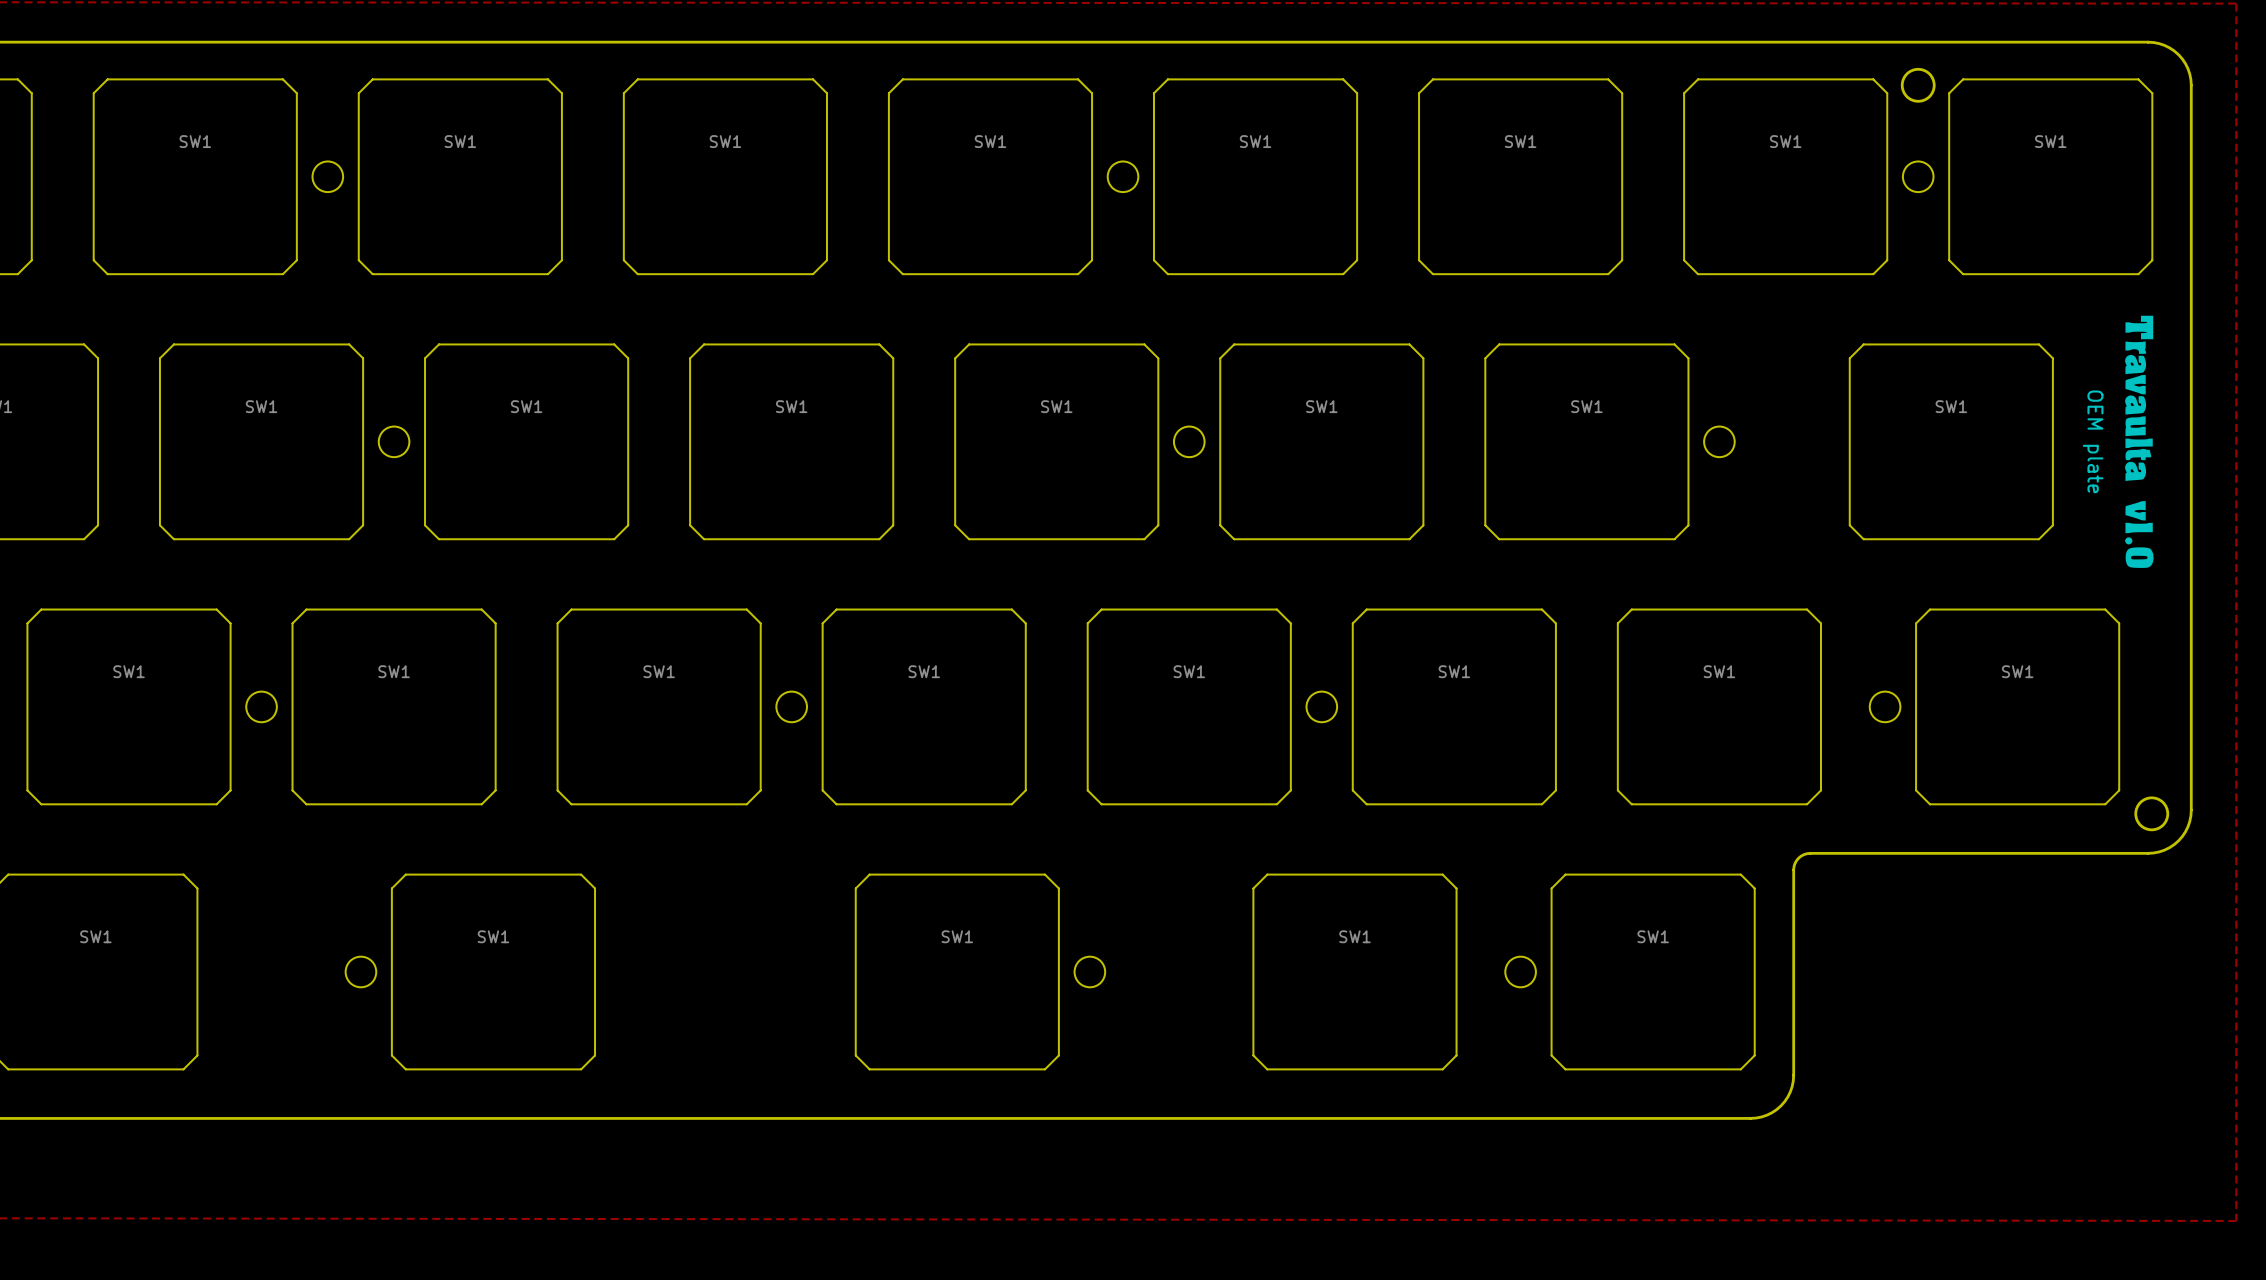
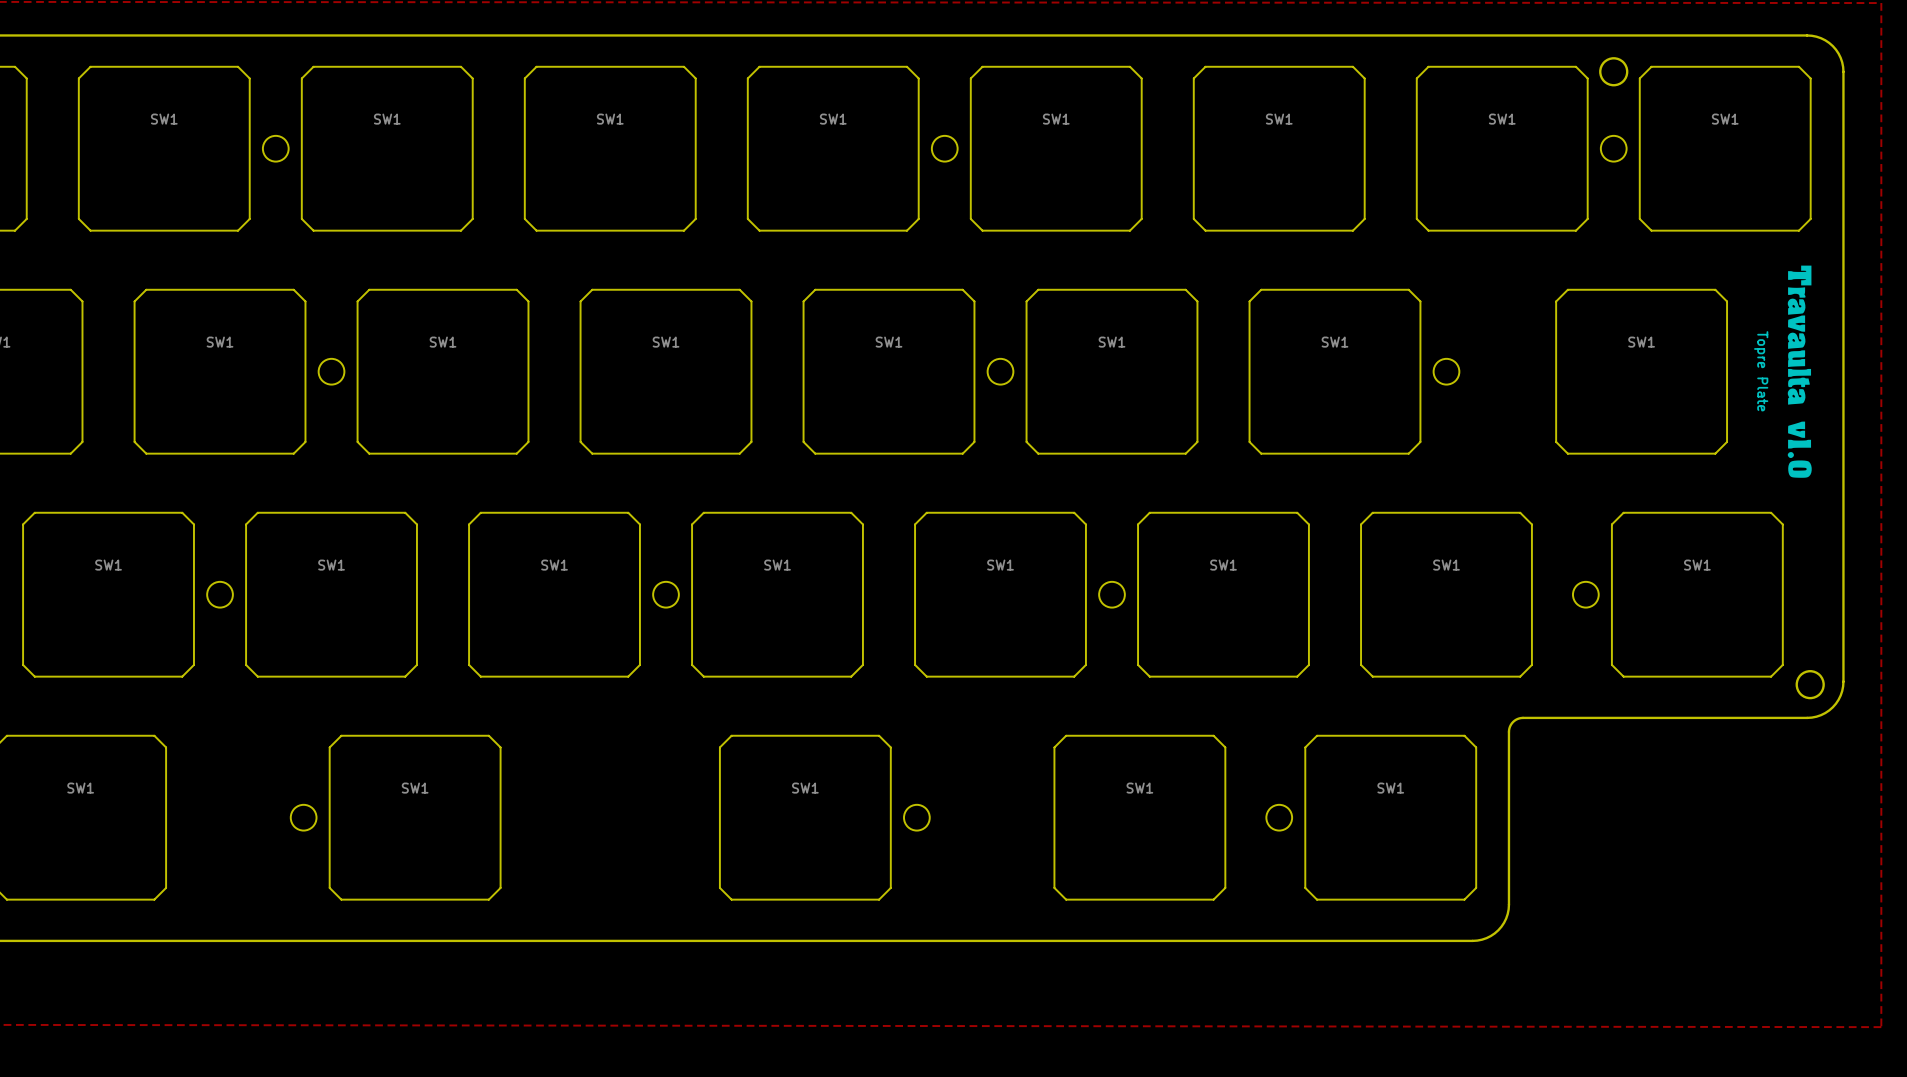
text: OEM plate (2093, 441) -> Topre Plate (1761, 371)

